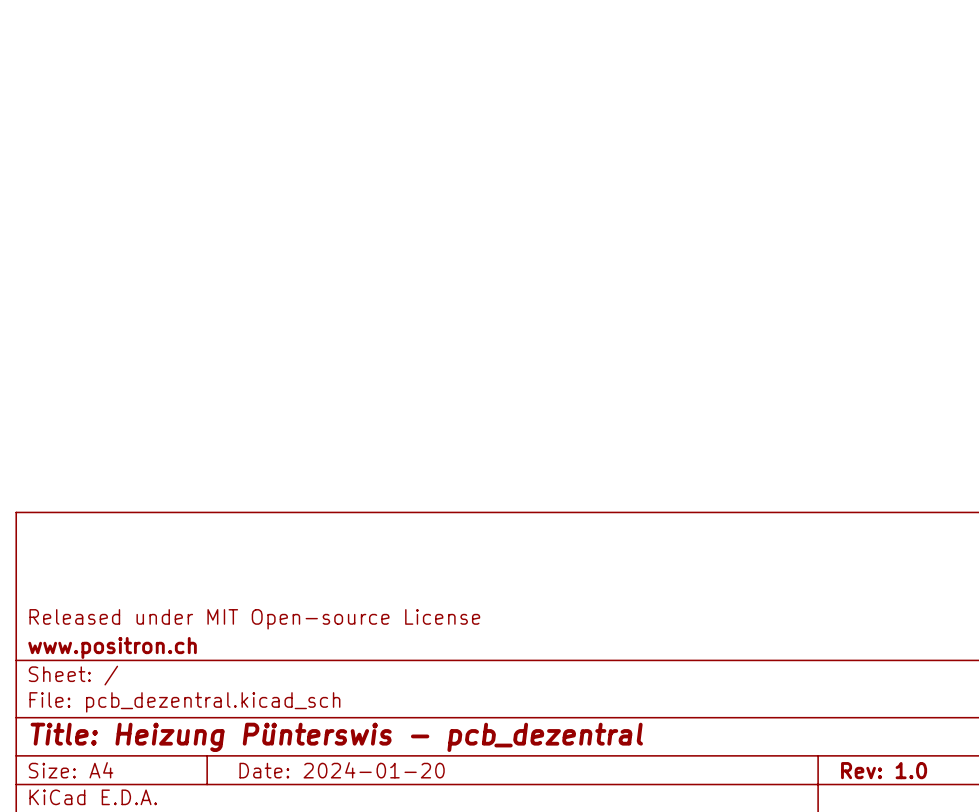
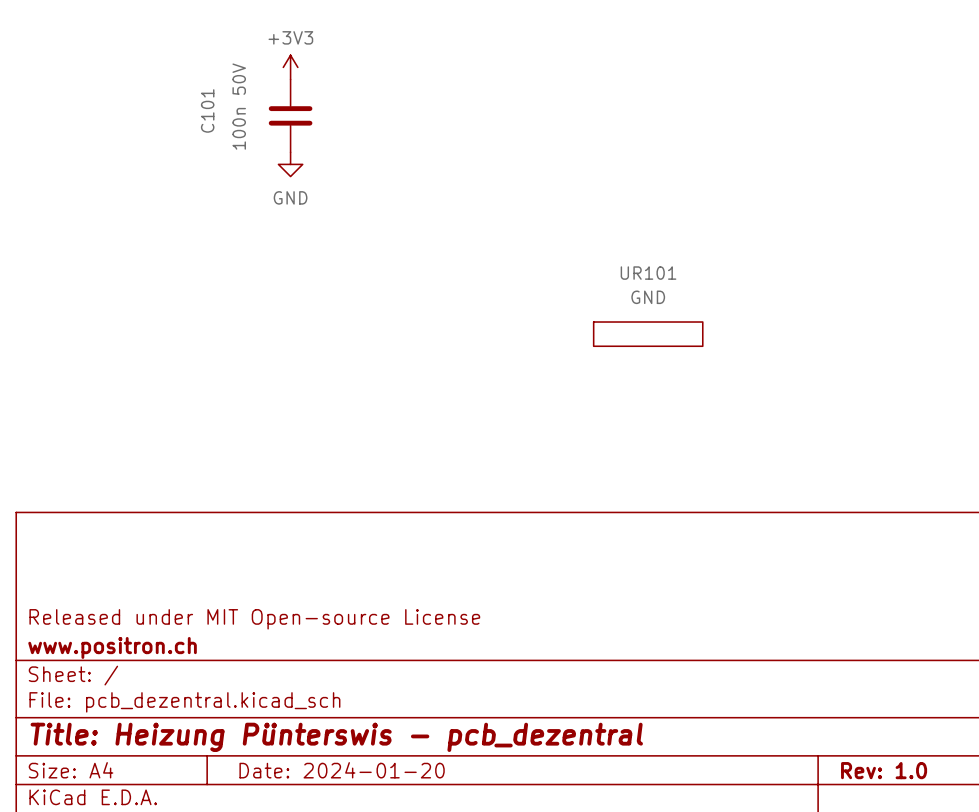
power symbol: none -> +3V3 (290, 67)
C101: none -> 100n 50V (290, 115)
power symbol: none -> GND (290, 164)
UR101: none -> GND (648, 334)

